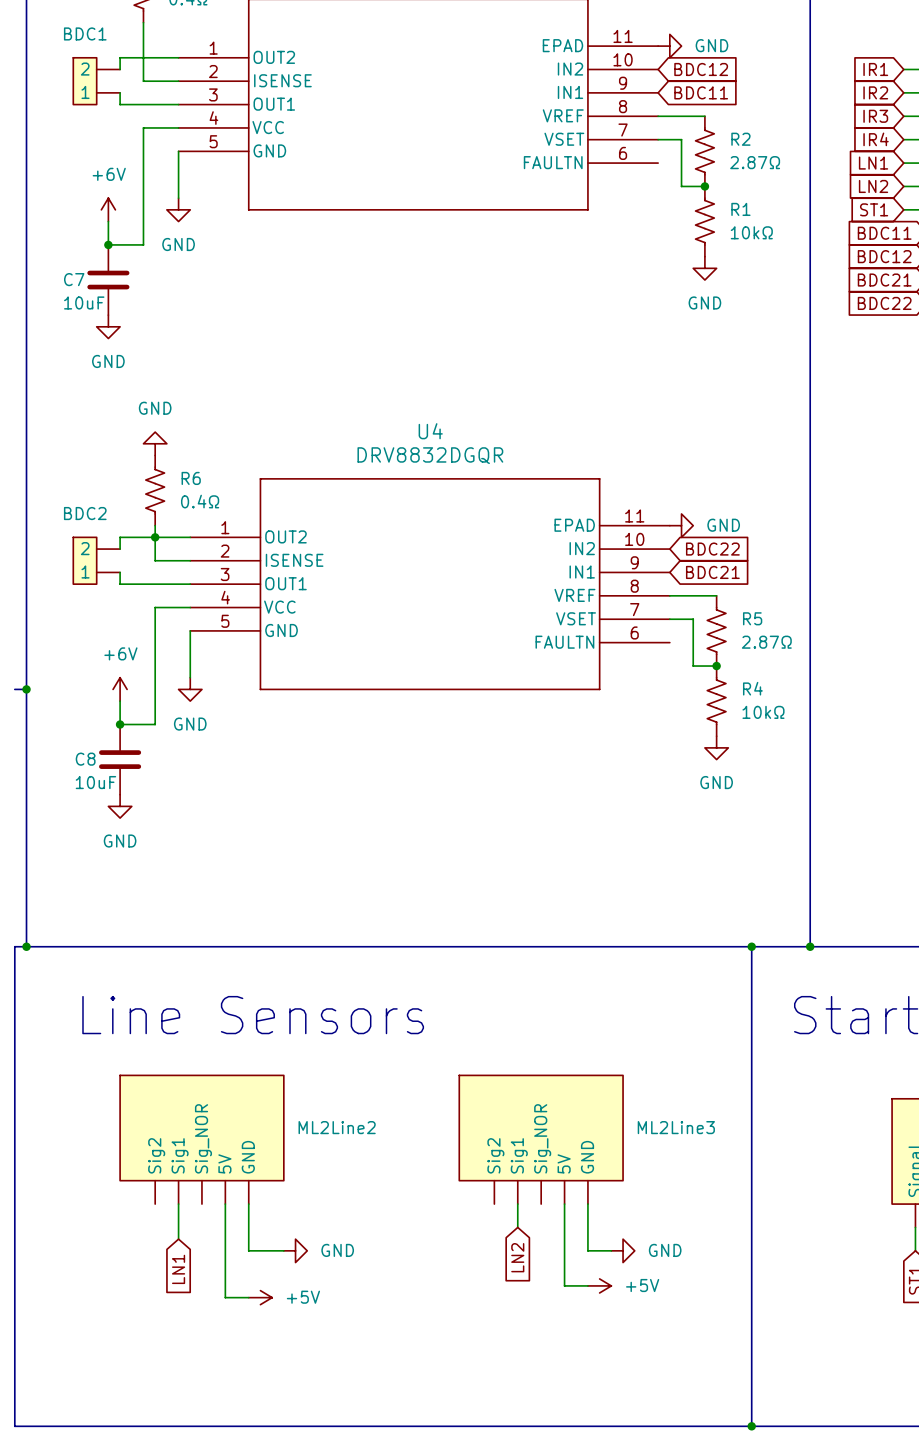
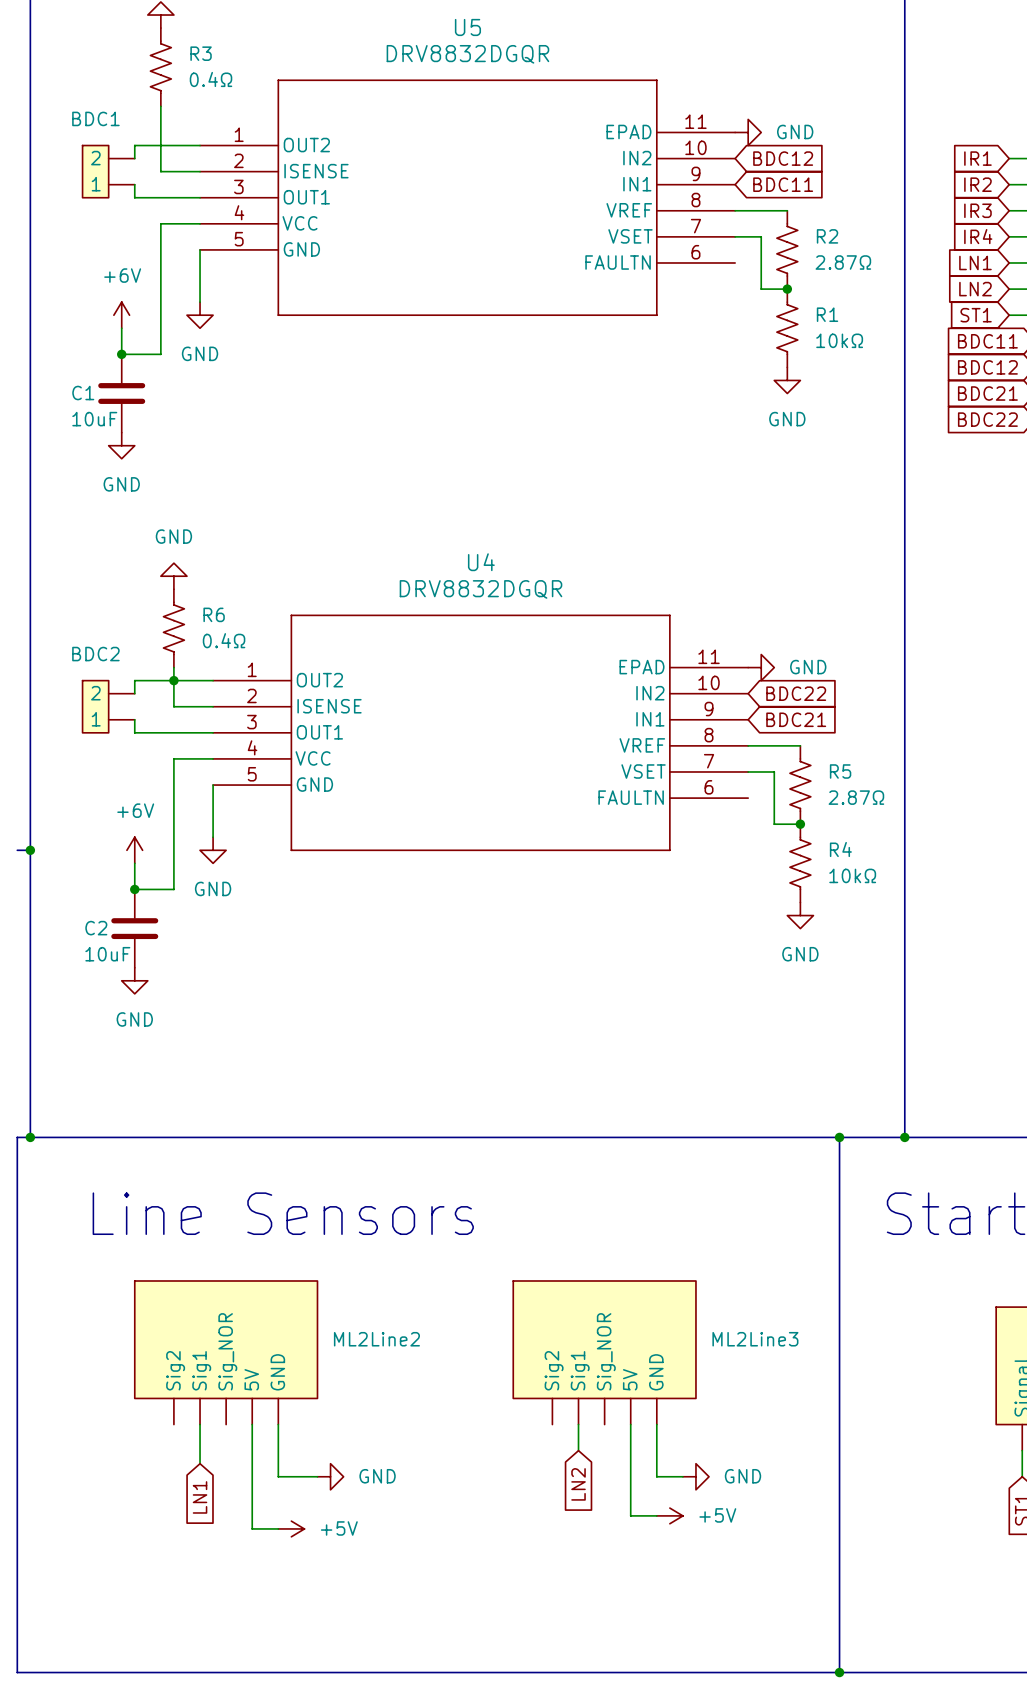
C7 name: C7 (74, 279) -> C1 (83, 393)
C8 name: C8 (85, 759) -> C2 (96, 928)

